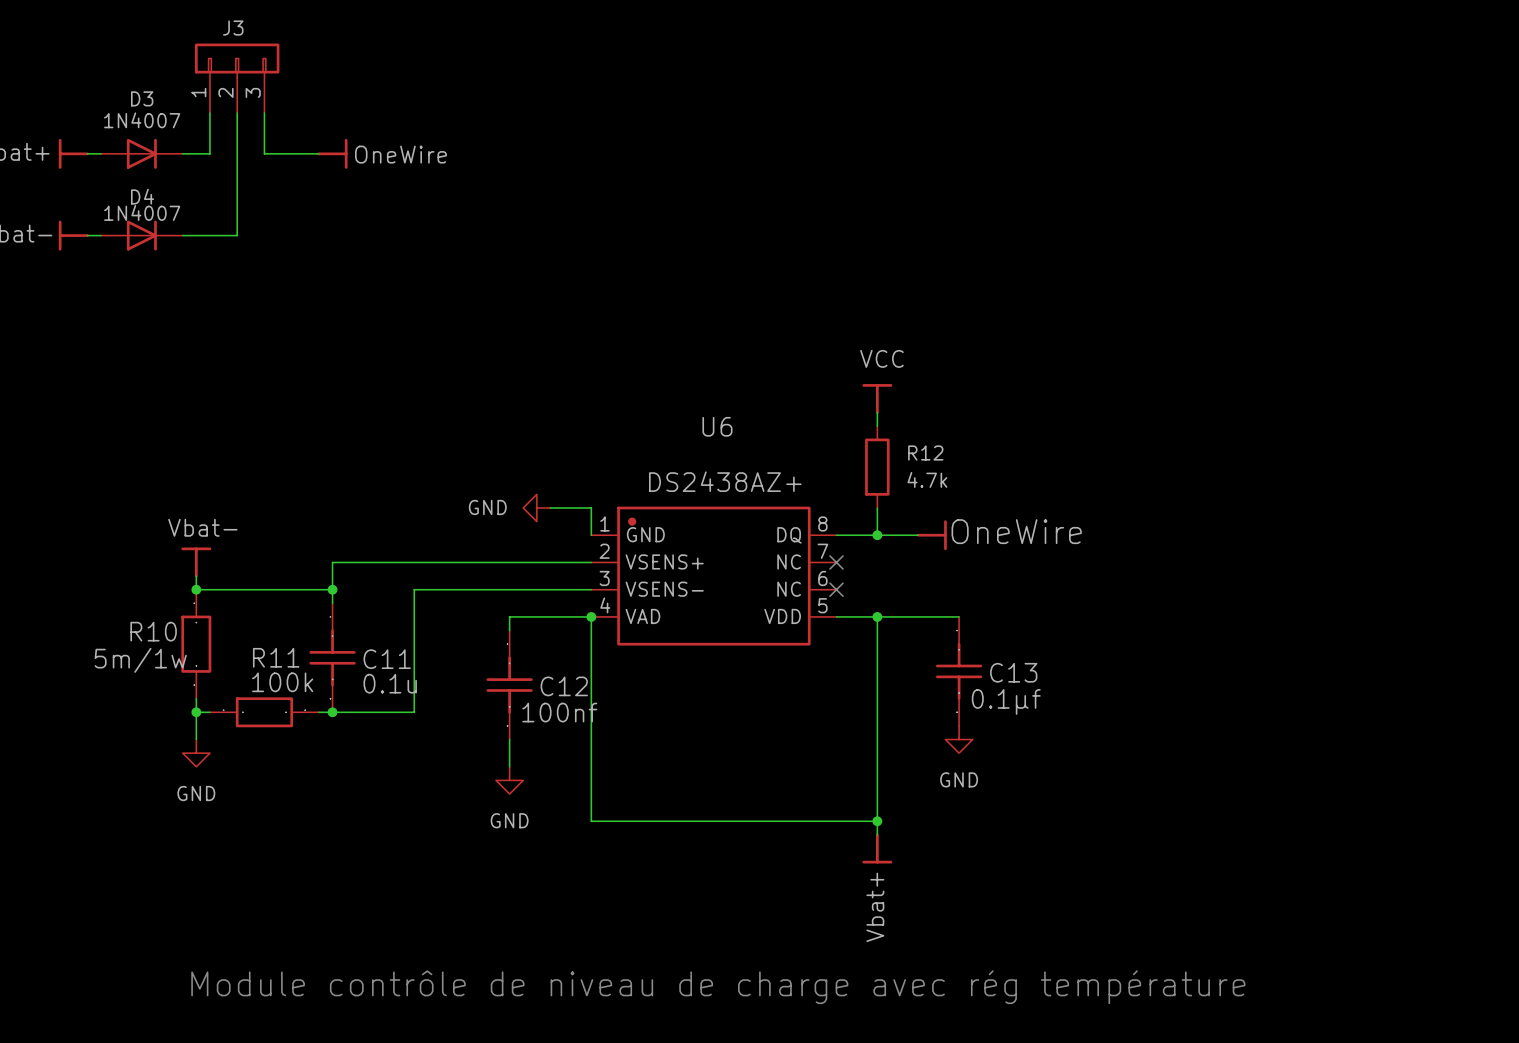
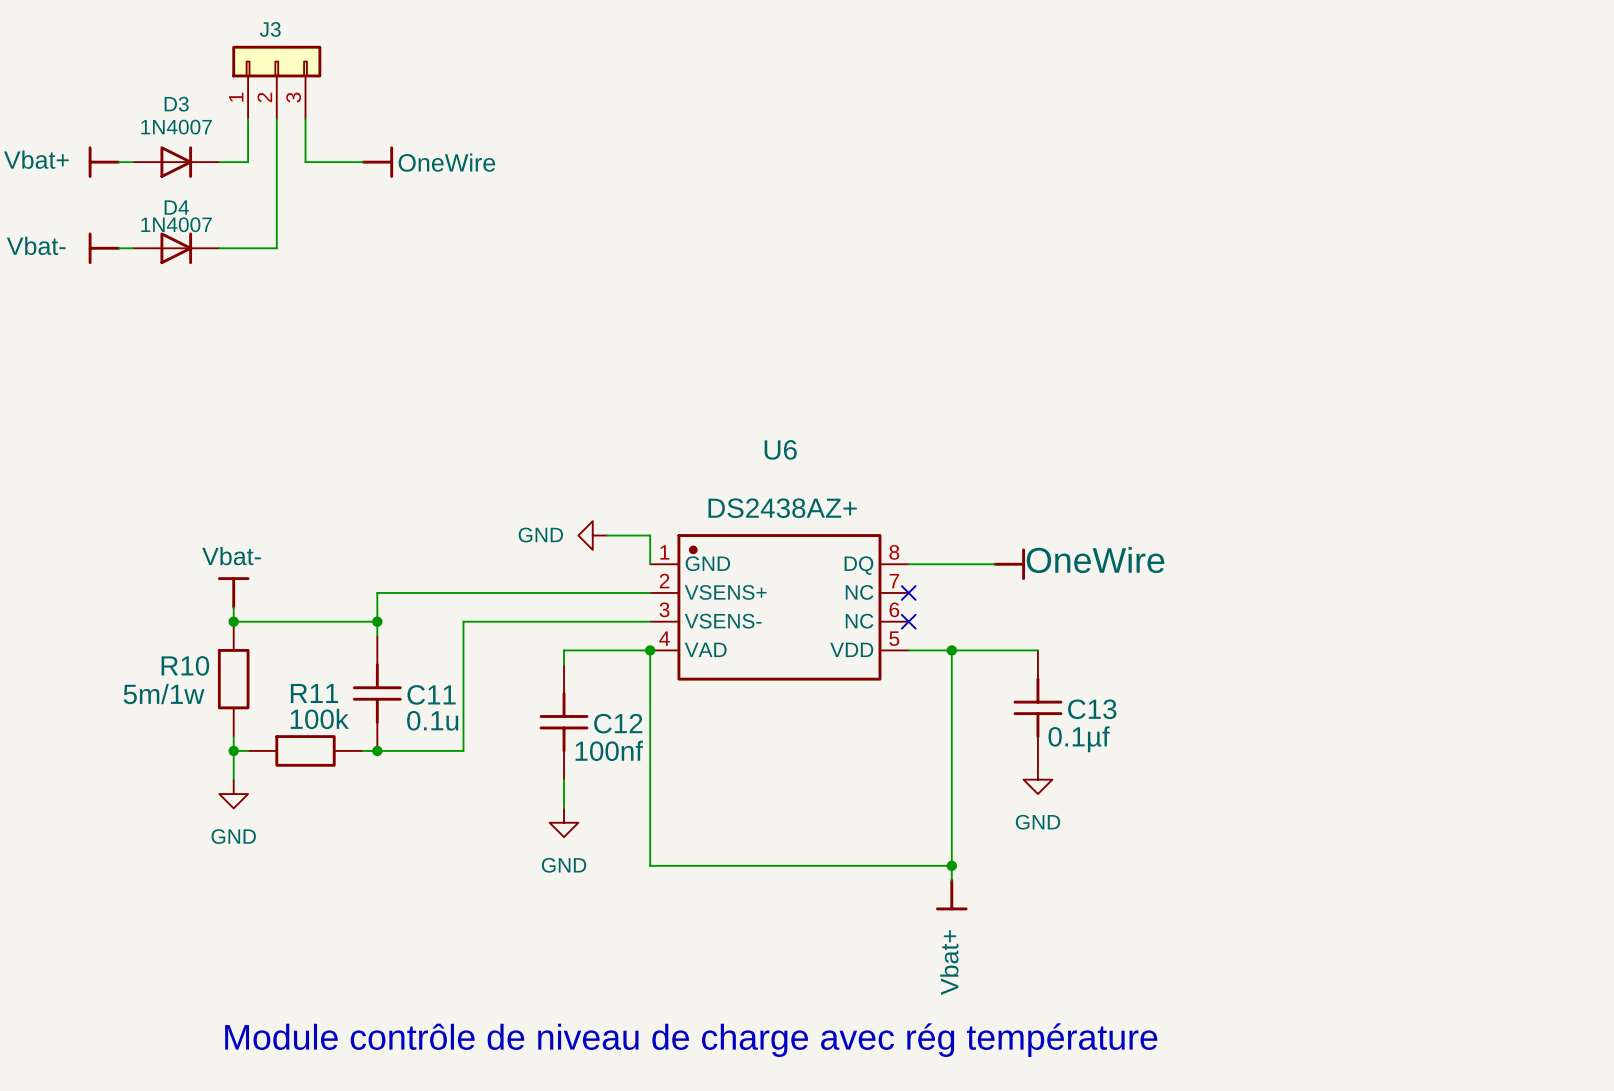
power symbol: VCC (877, 399) -> none
wire: (877, 412) (877, 426) -> none
R12: 4.7k (877, 467) -> none
wire: (877, 507) (877, 535) -> none
junction: (877, 535) -> none

